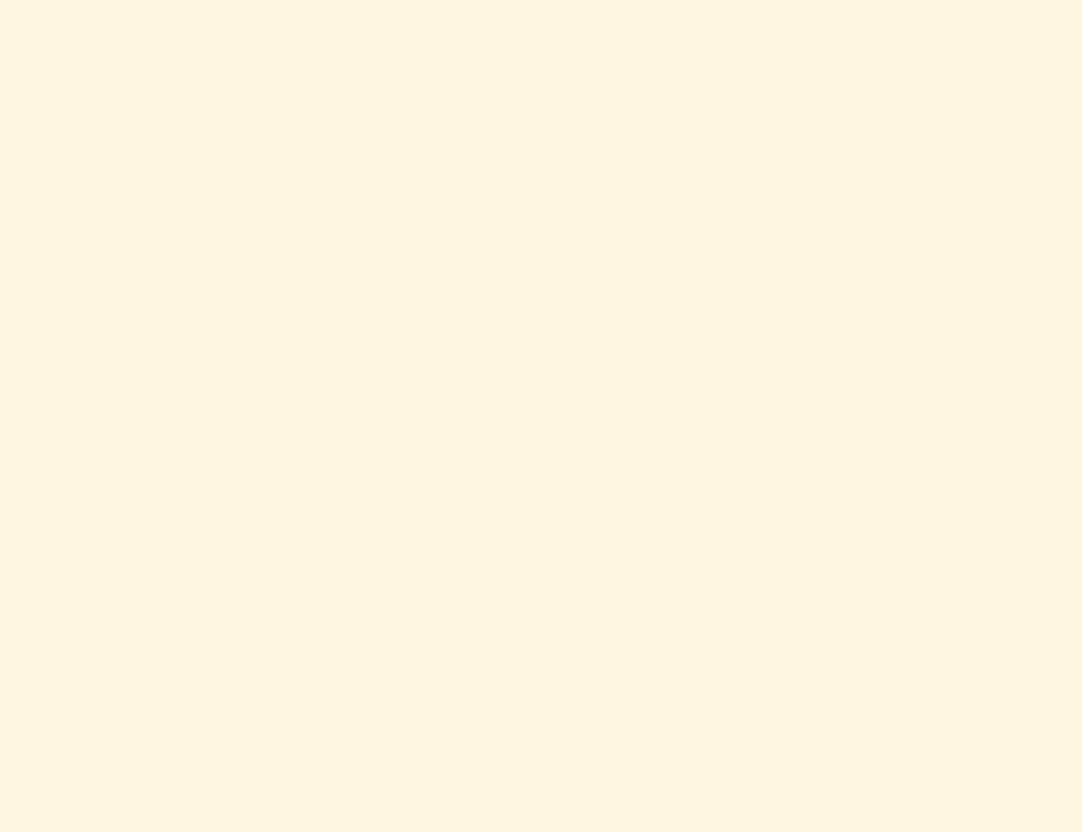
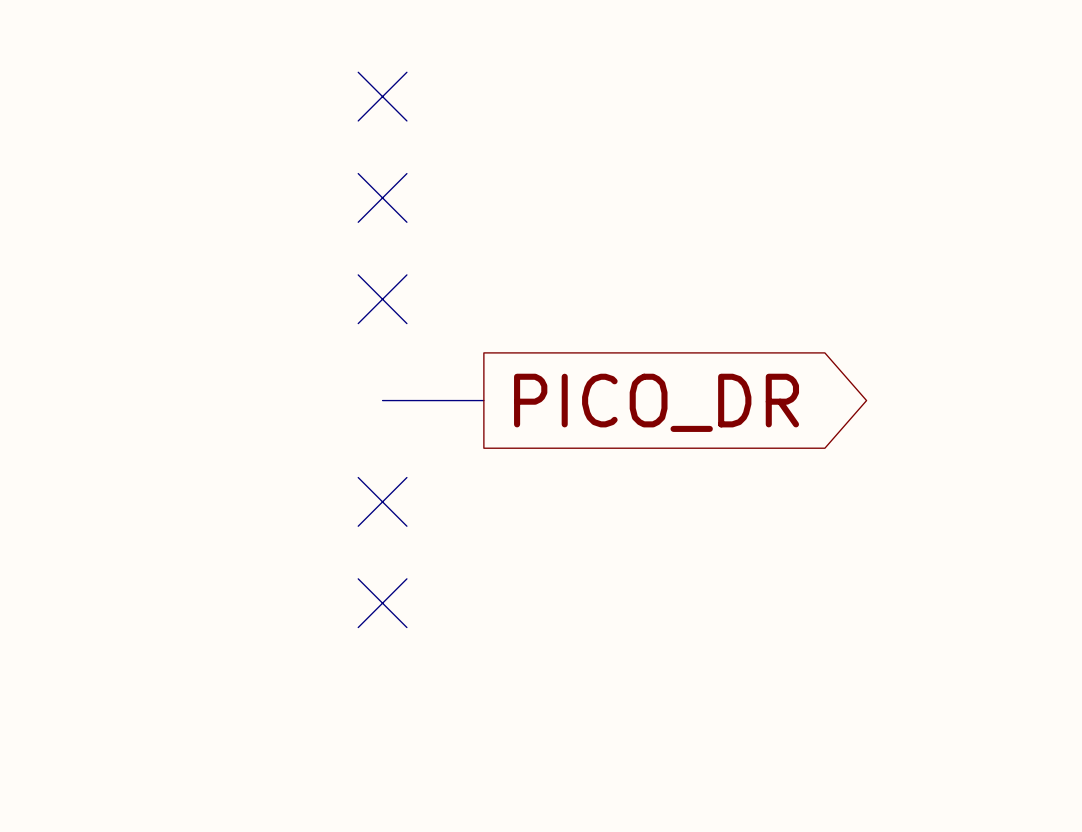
no-connect mark: none -> (382, 96)
no-connect mark: none -> (382, 197)
no-connect mark: none -> (382, 299)
wire: none -> (382, 400) (483, 400)
global label: none -> PICO_DR (656, 402)
no-connect mark: none -> (382, 501)
no-connect mark: none -> (382, 603)

